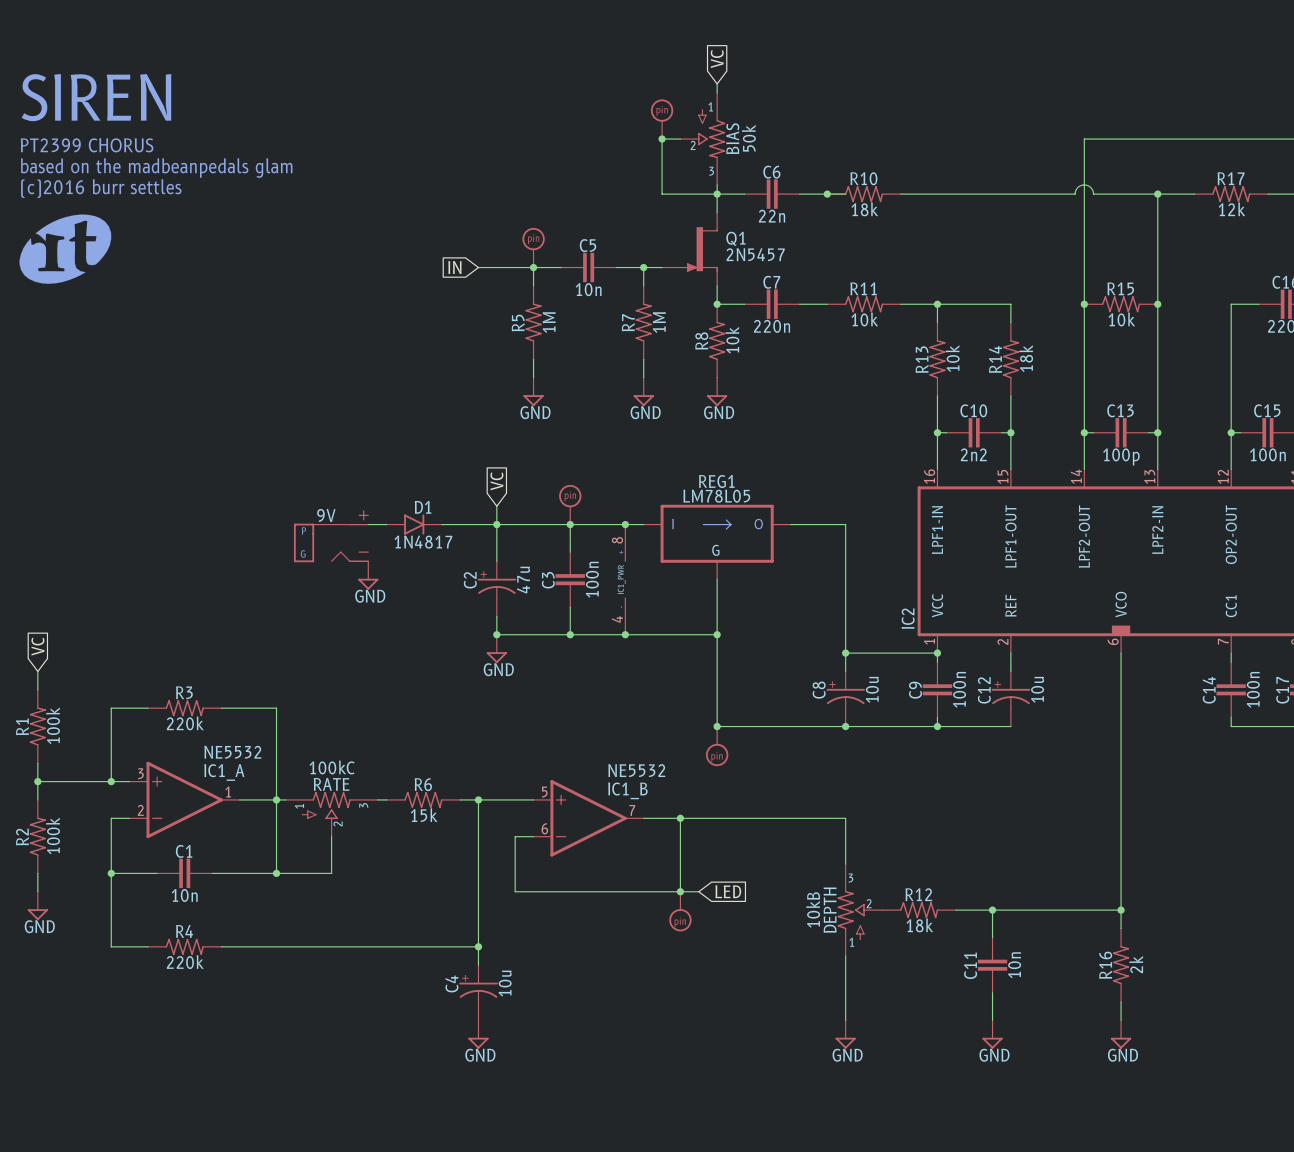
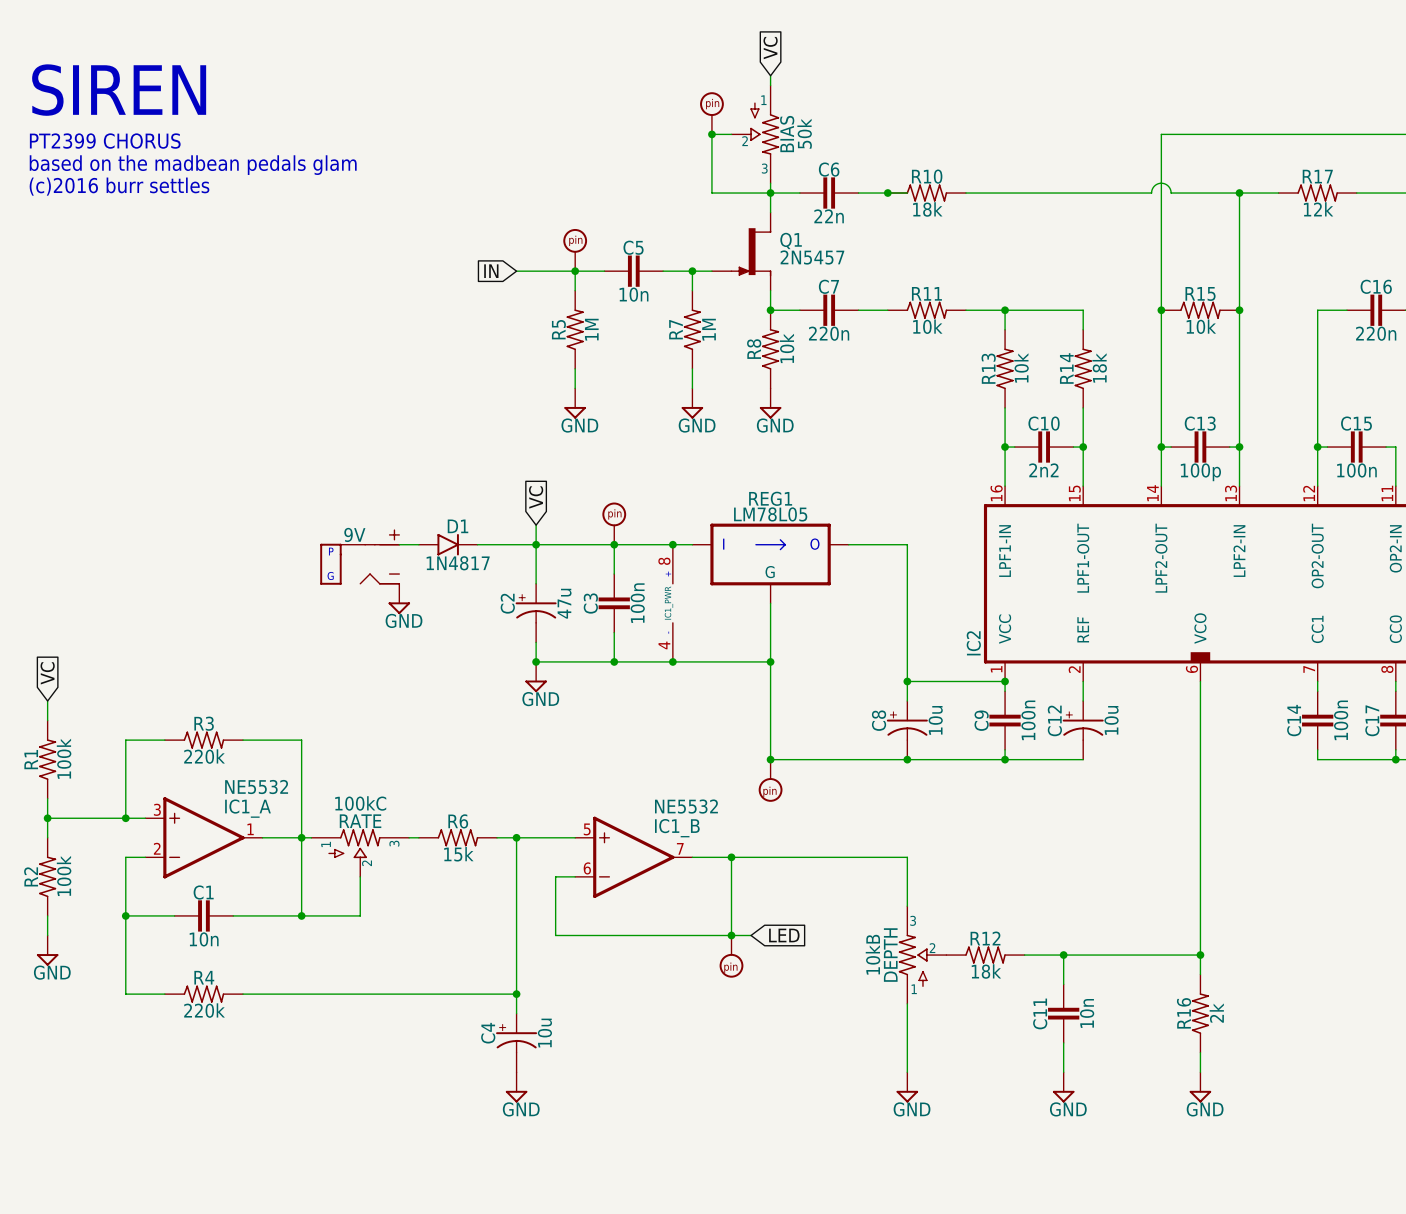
text: based on the madbeanpedals glam (156, 168) -> based on the madbean pedals glam (193, 165)
part: (65, 249) -> none

